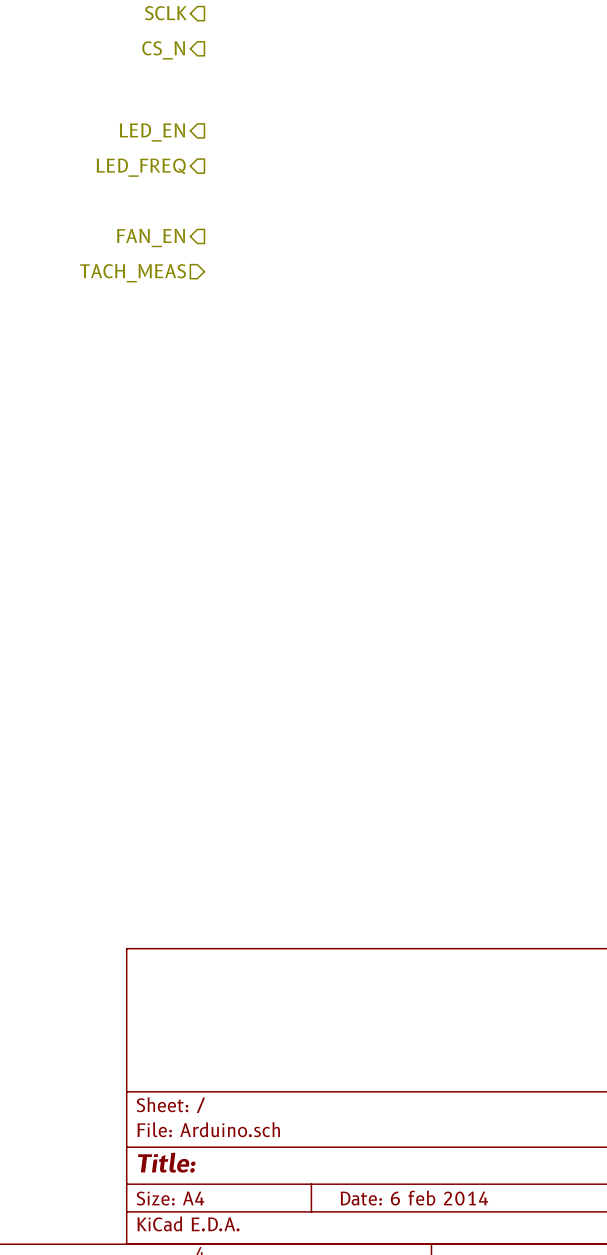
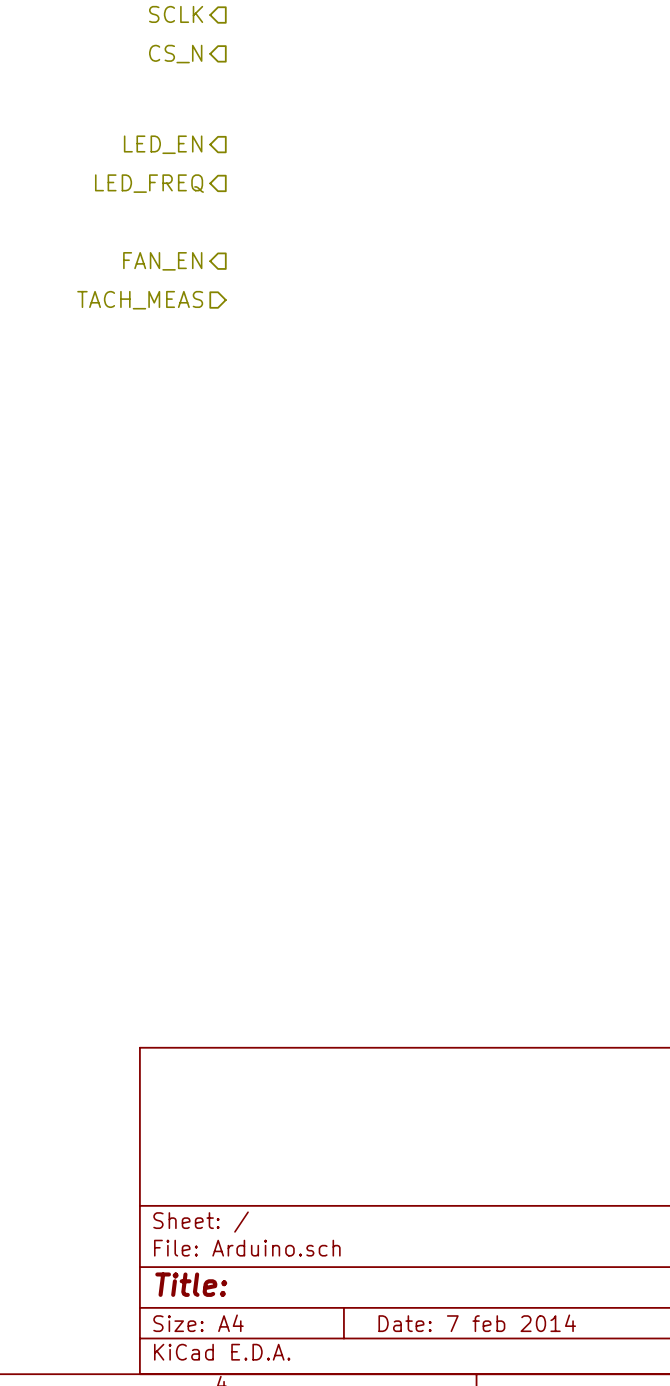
title block: Date: 6 feb 2014 (414, 1198) -> Date: 7 feb 2014 (477, 1323)

